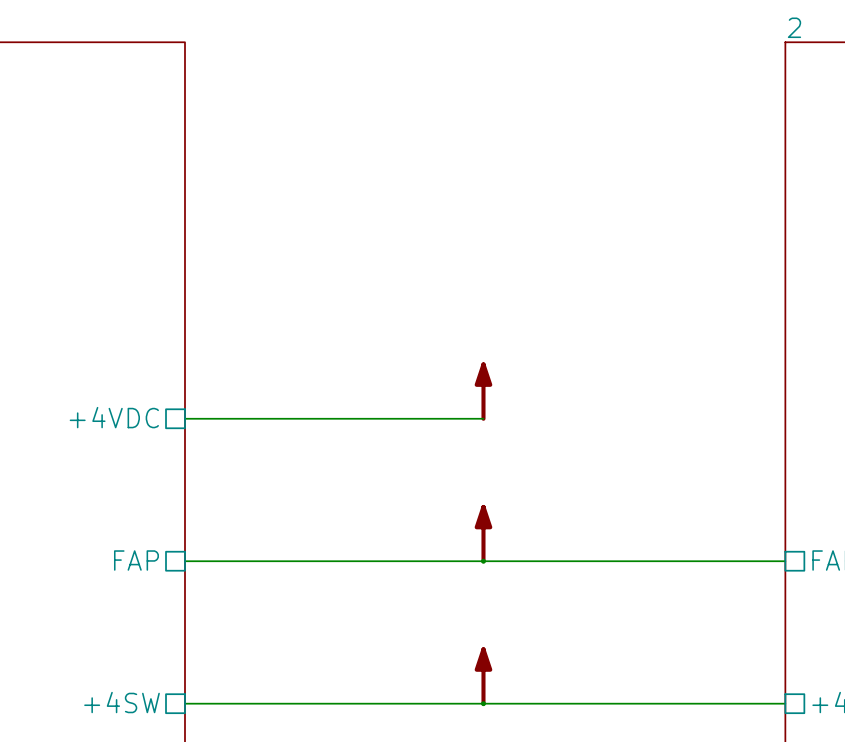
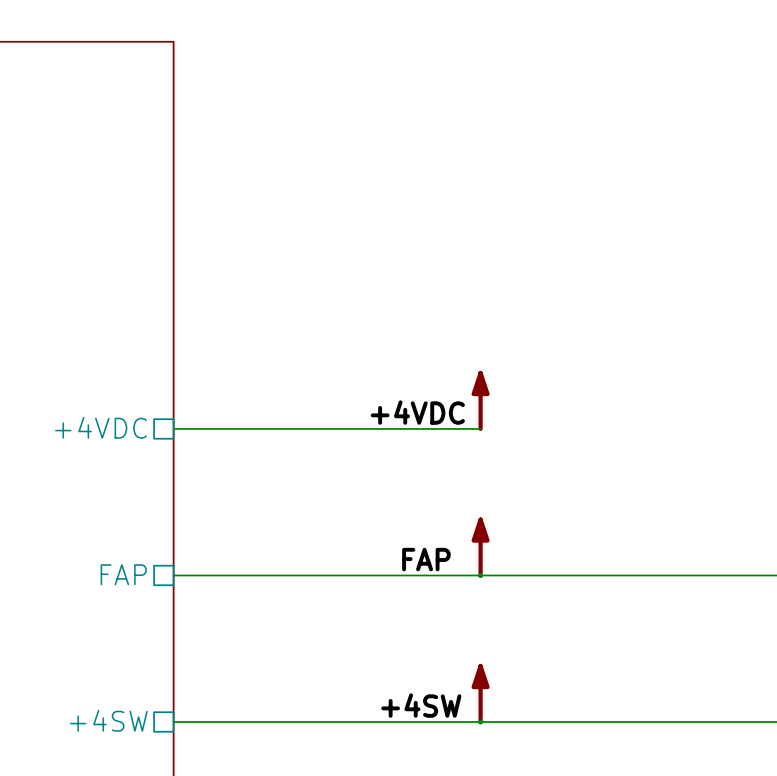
label: none -> +4VDC (417, 412)
label: none -> FAP (426, 559)
label: none -> +4SW (421, 705)

